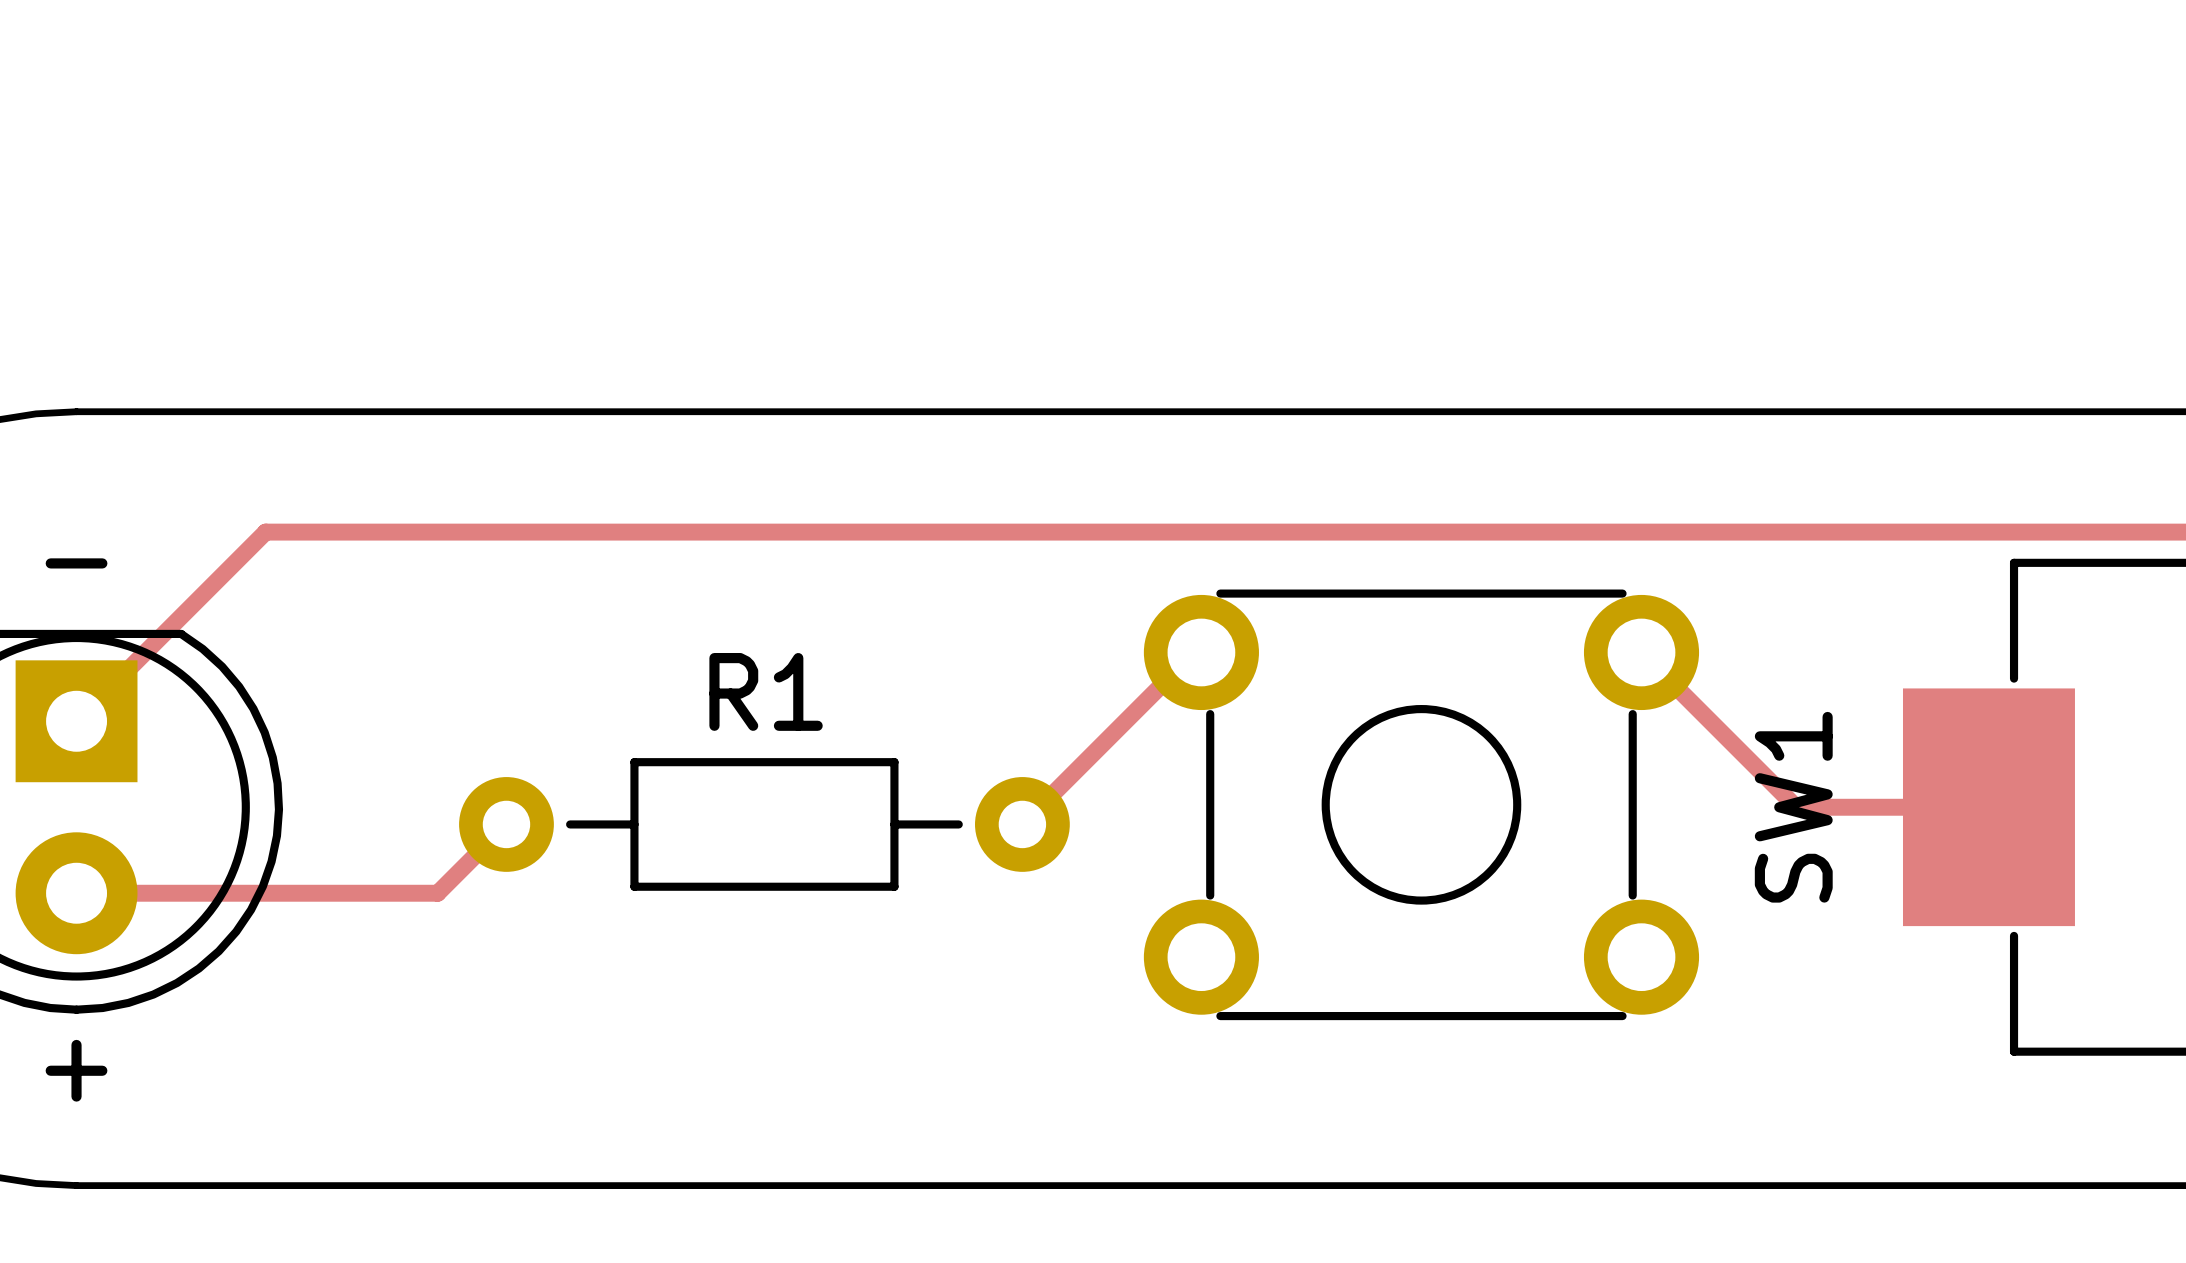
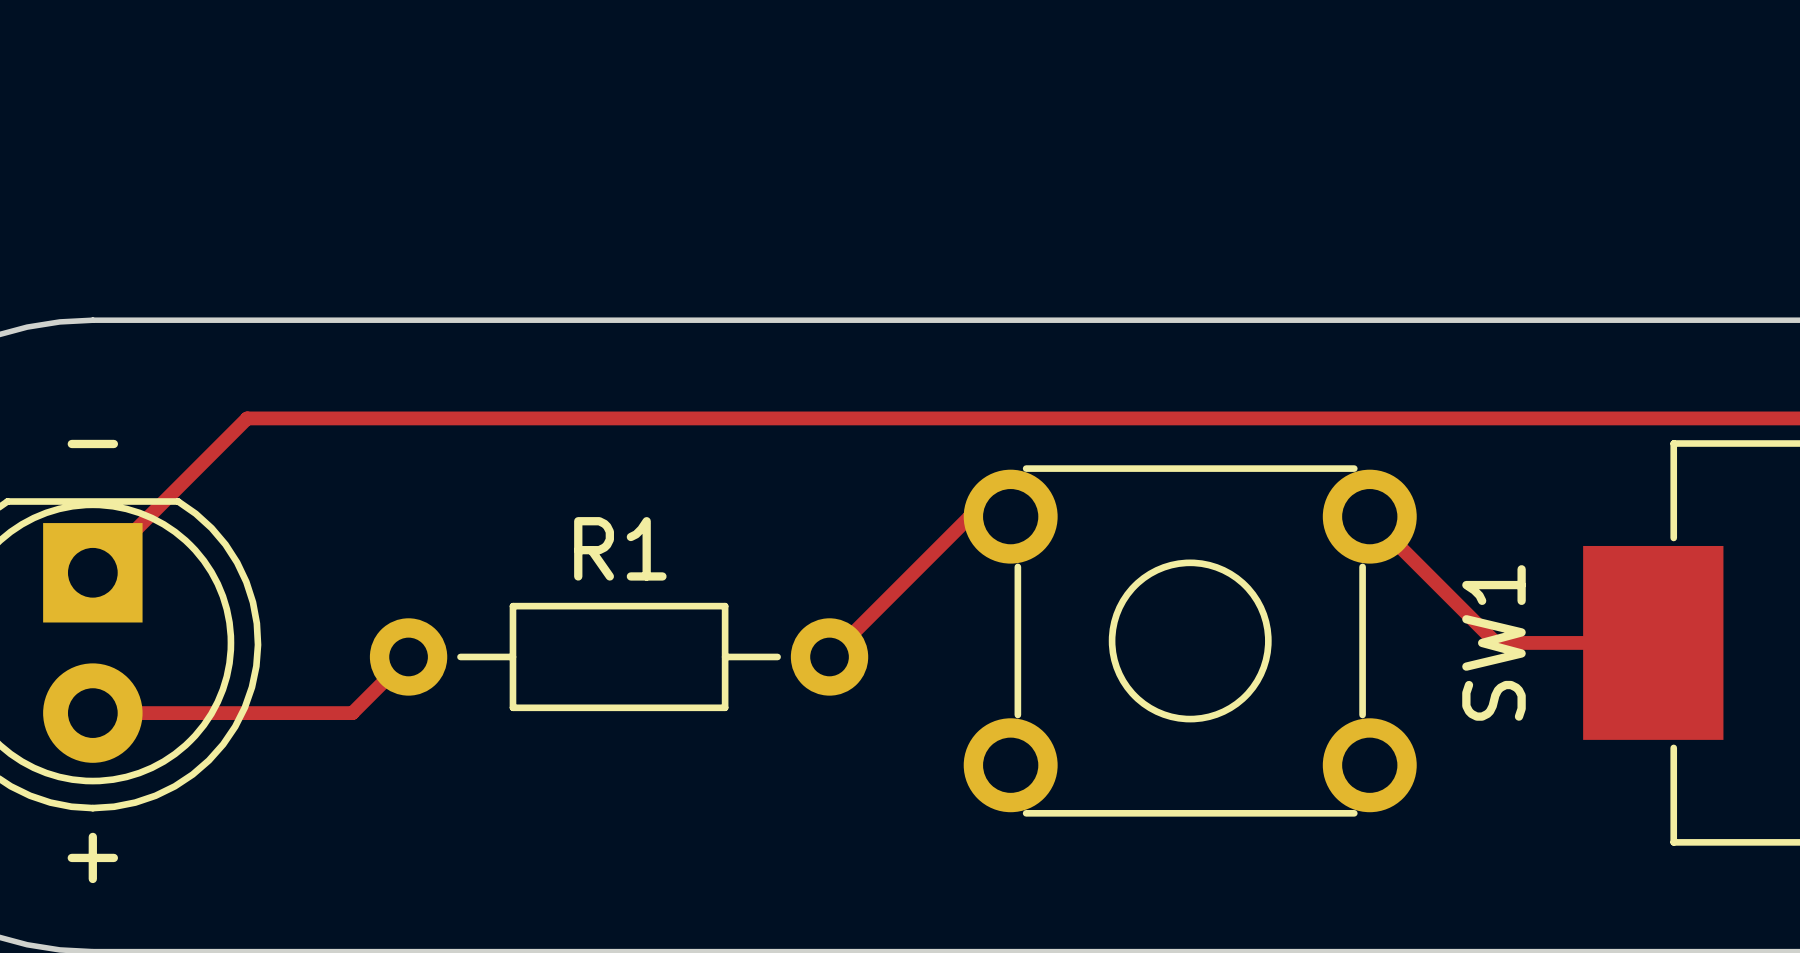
top track: (1194, 652) (1022, 824) -> (1004, 516) (969, 516) (829, 656)
top track: (506, 824) (437, 893) (394, 893) -> (408, 656) (352, 713)
R1 position: (764, 824) -> (619, 656)

